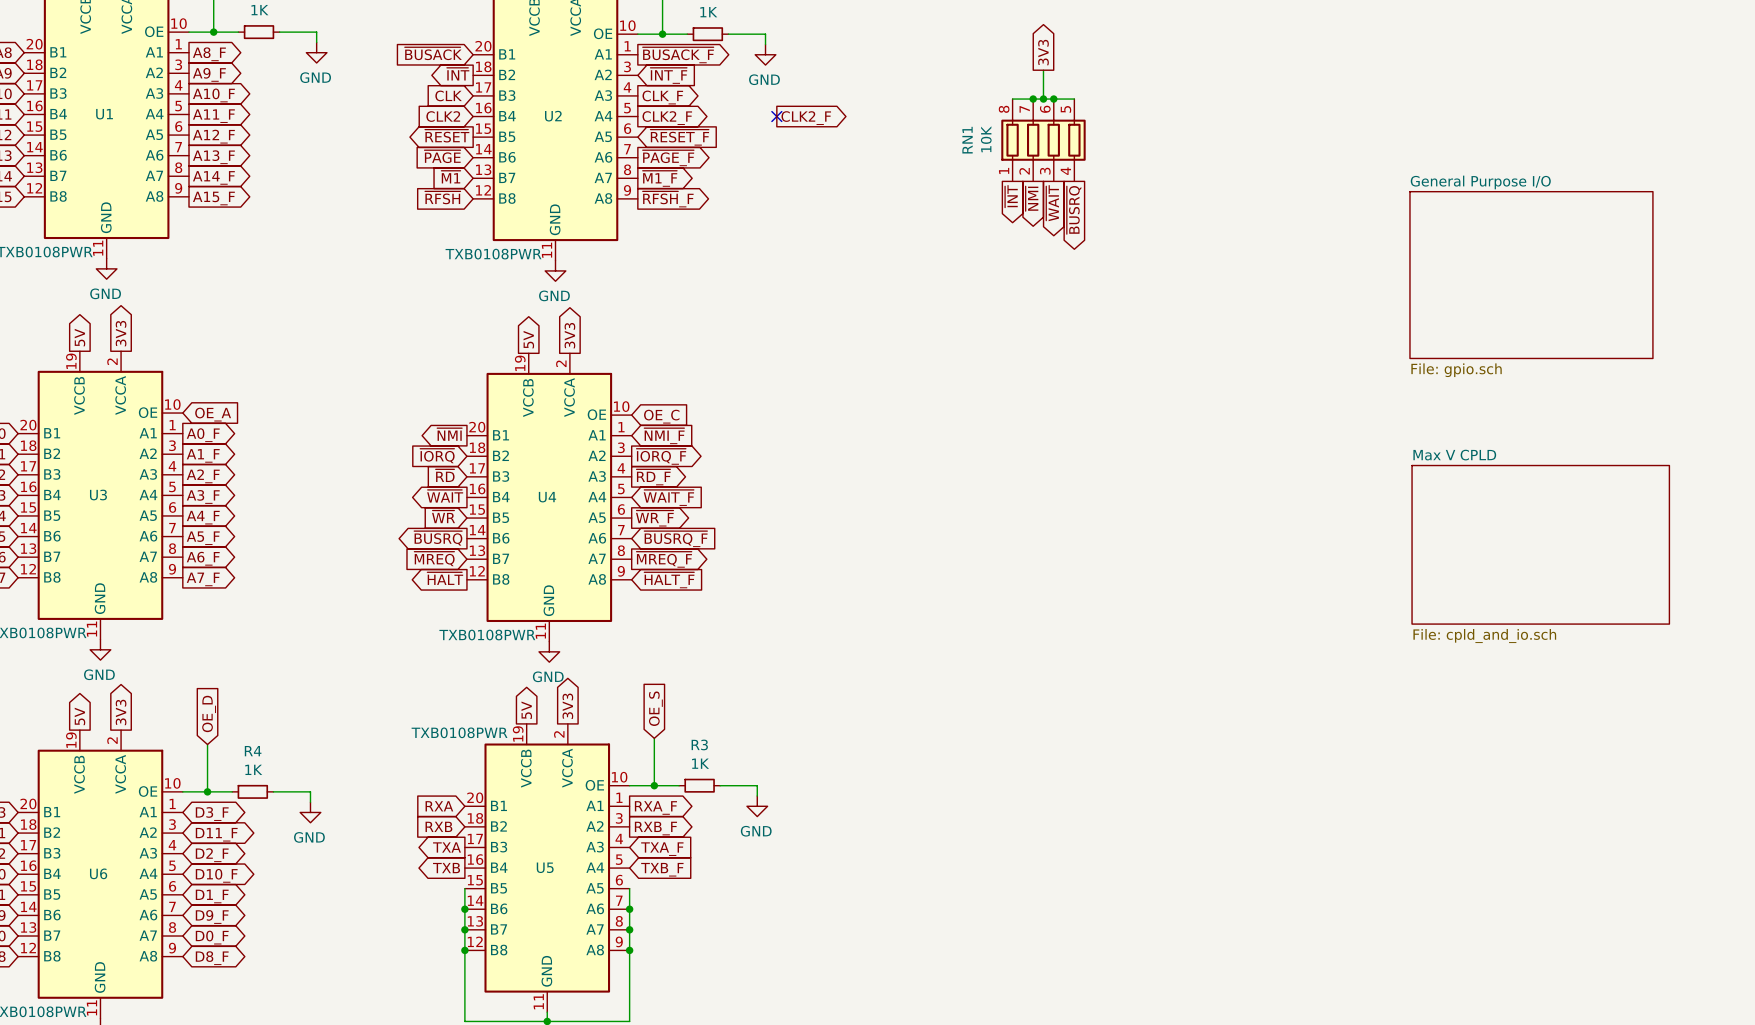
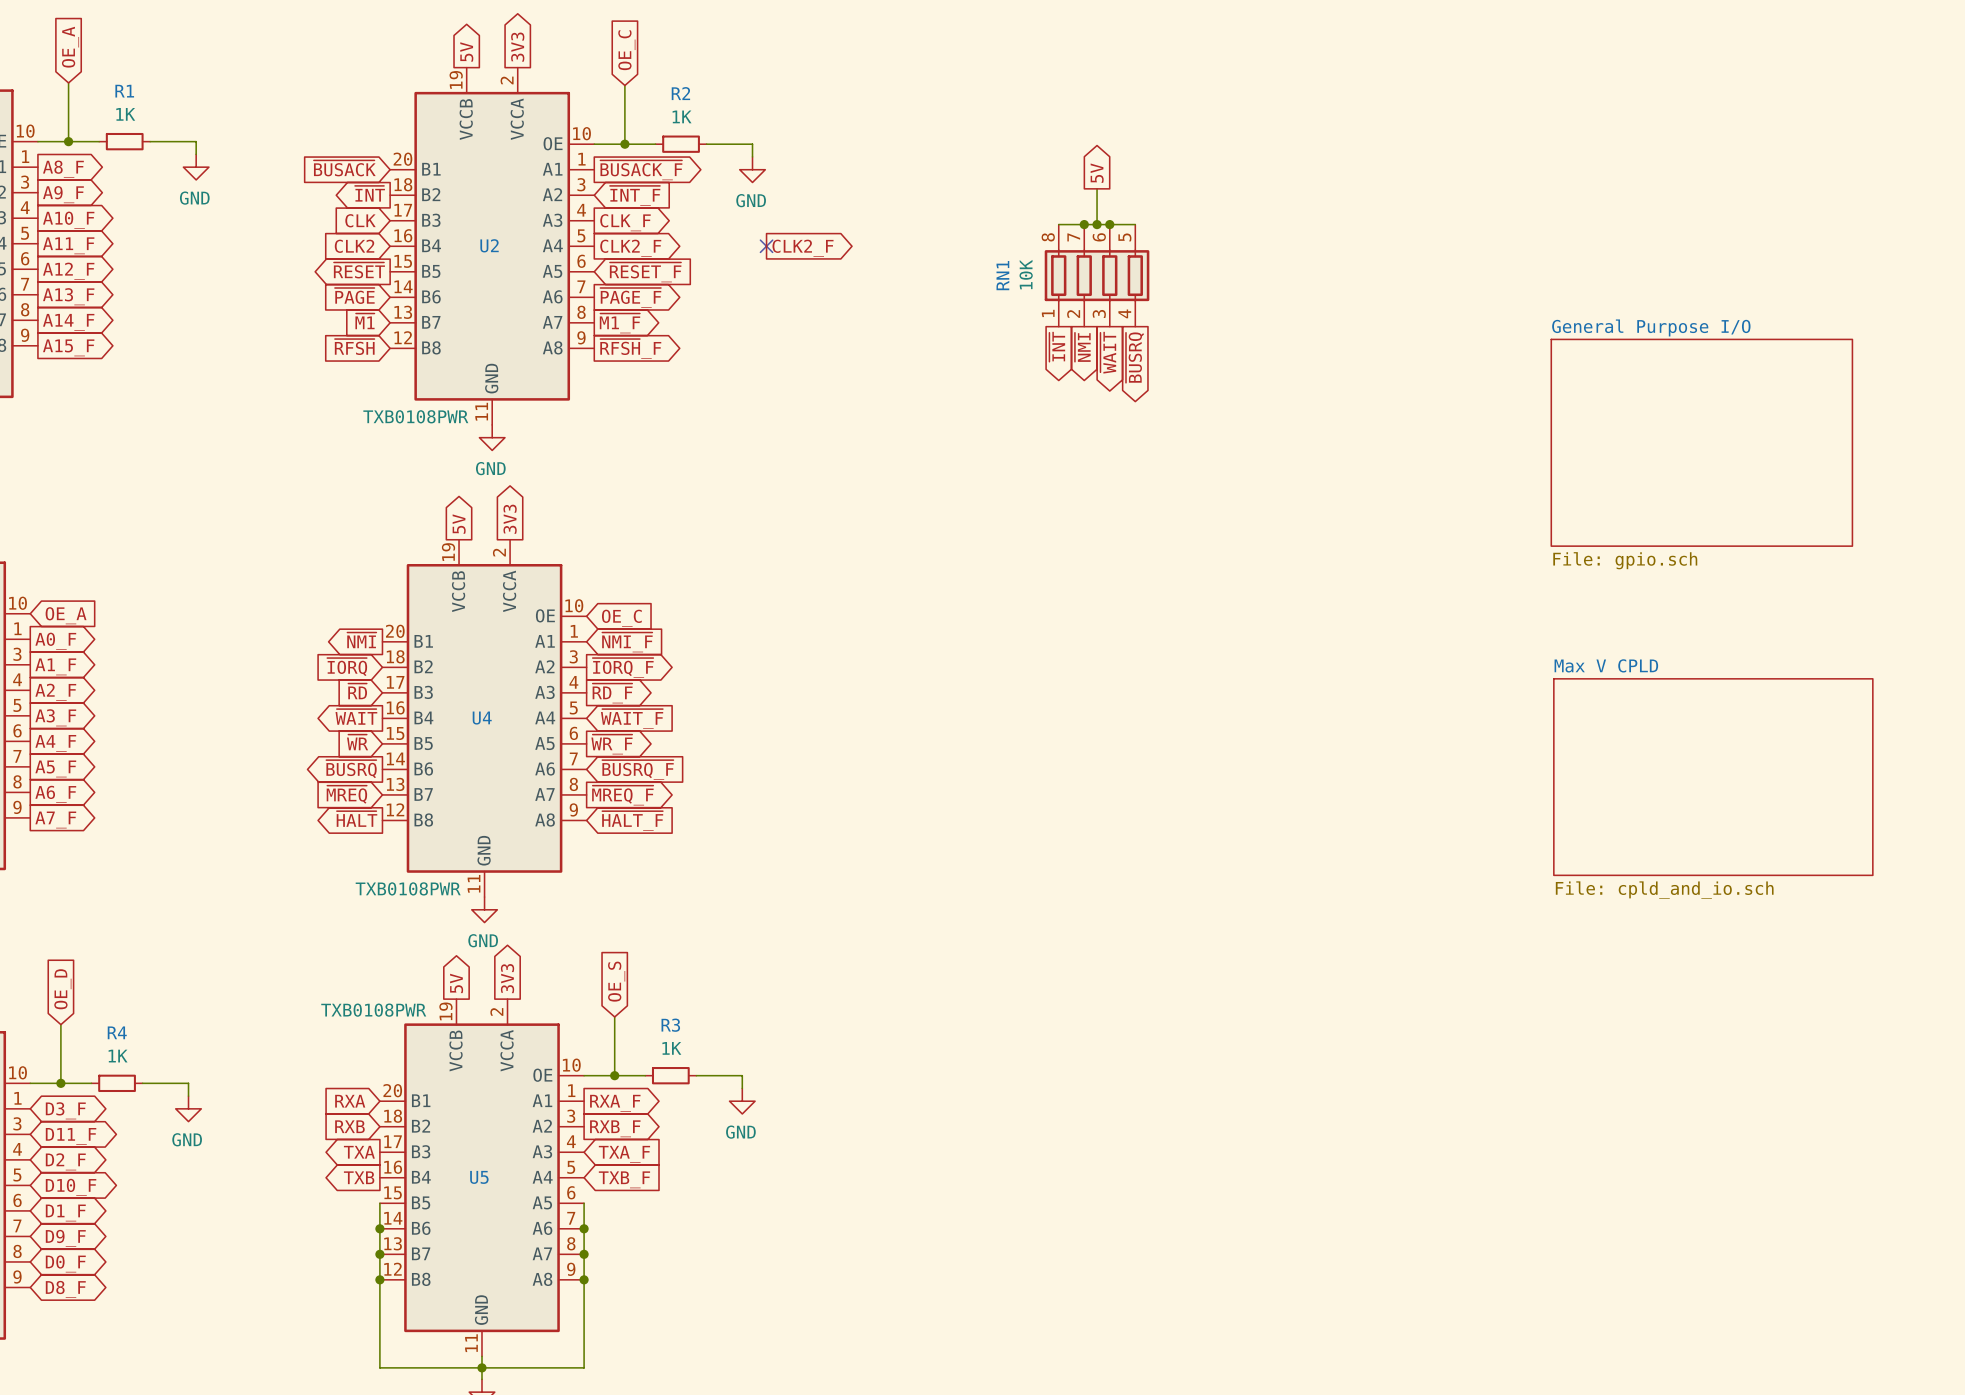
global label: 3V3 (1043, 52) -> 5V (1097, 173)

